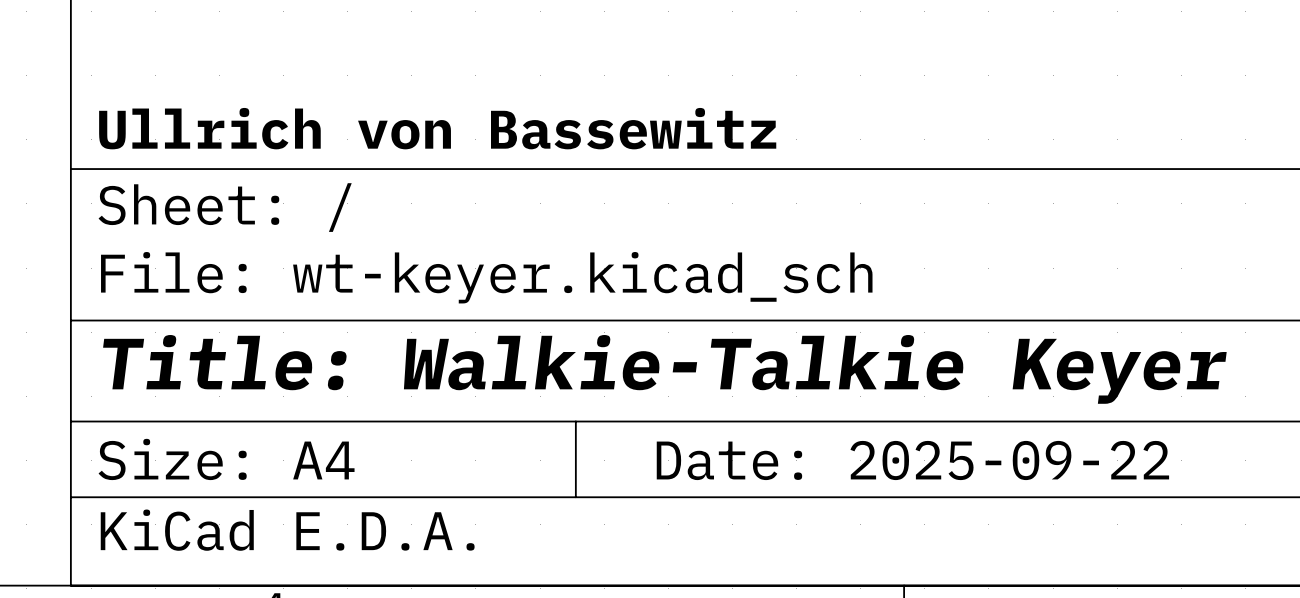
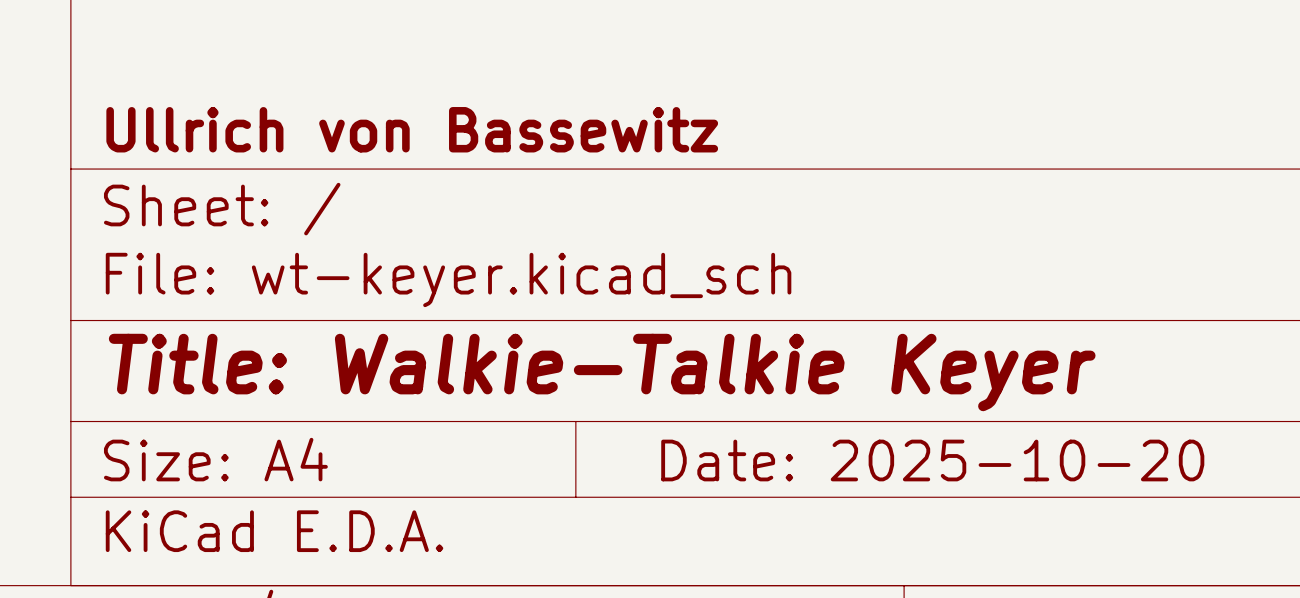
title block: Date: 2025-09-22 (912, 460) -> Date: 2025-10-20 (932, 460)

